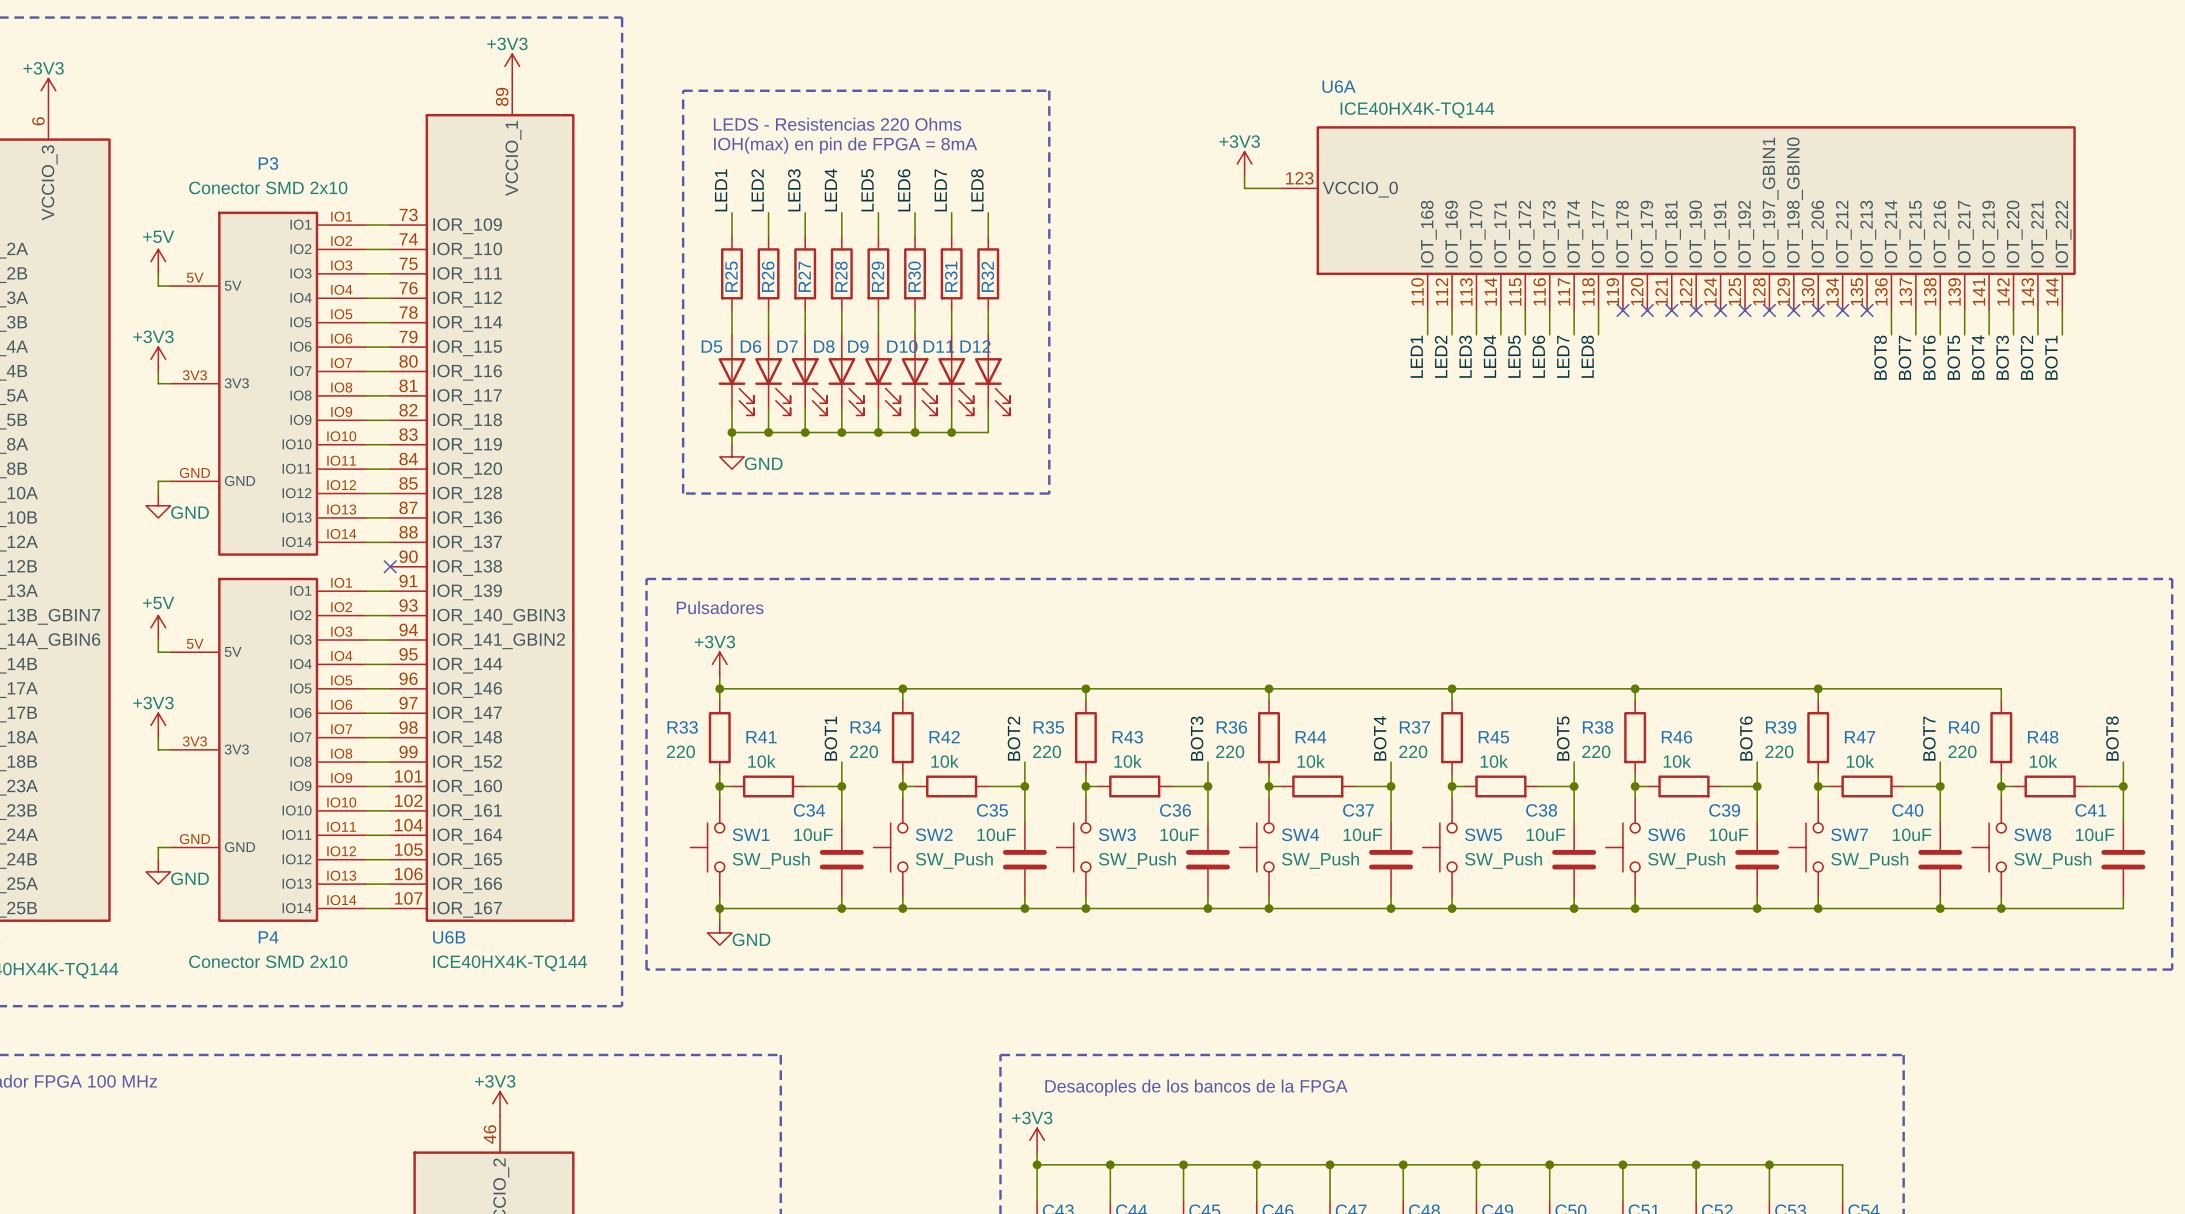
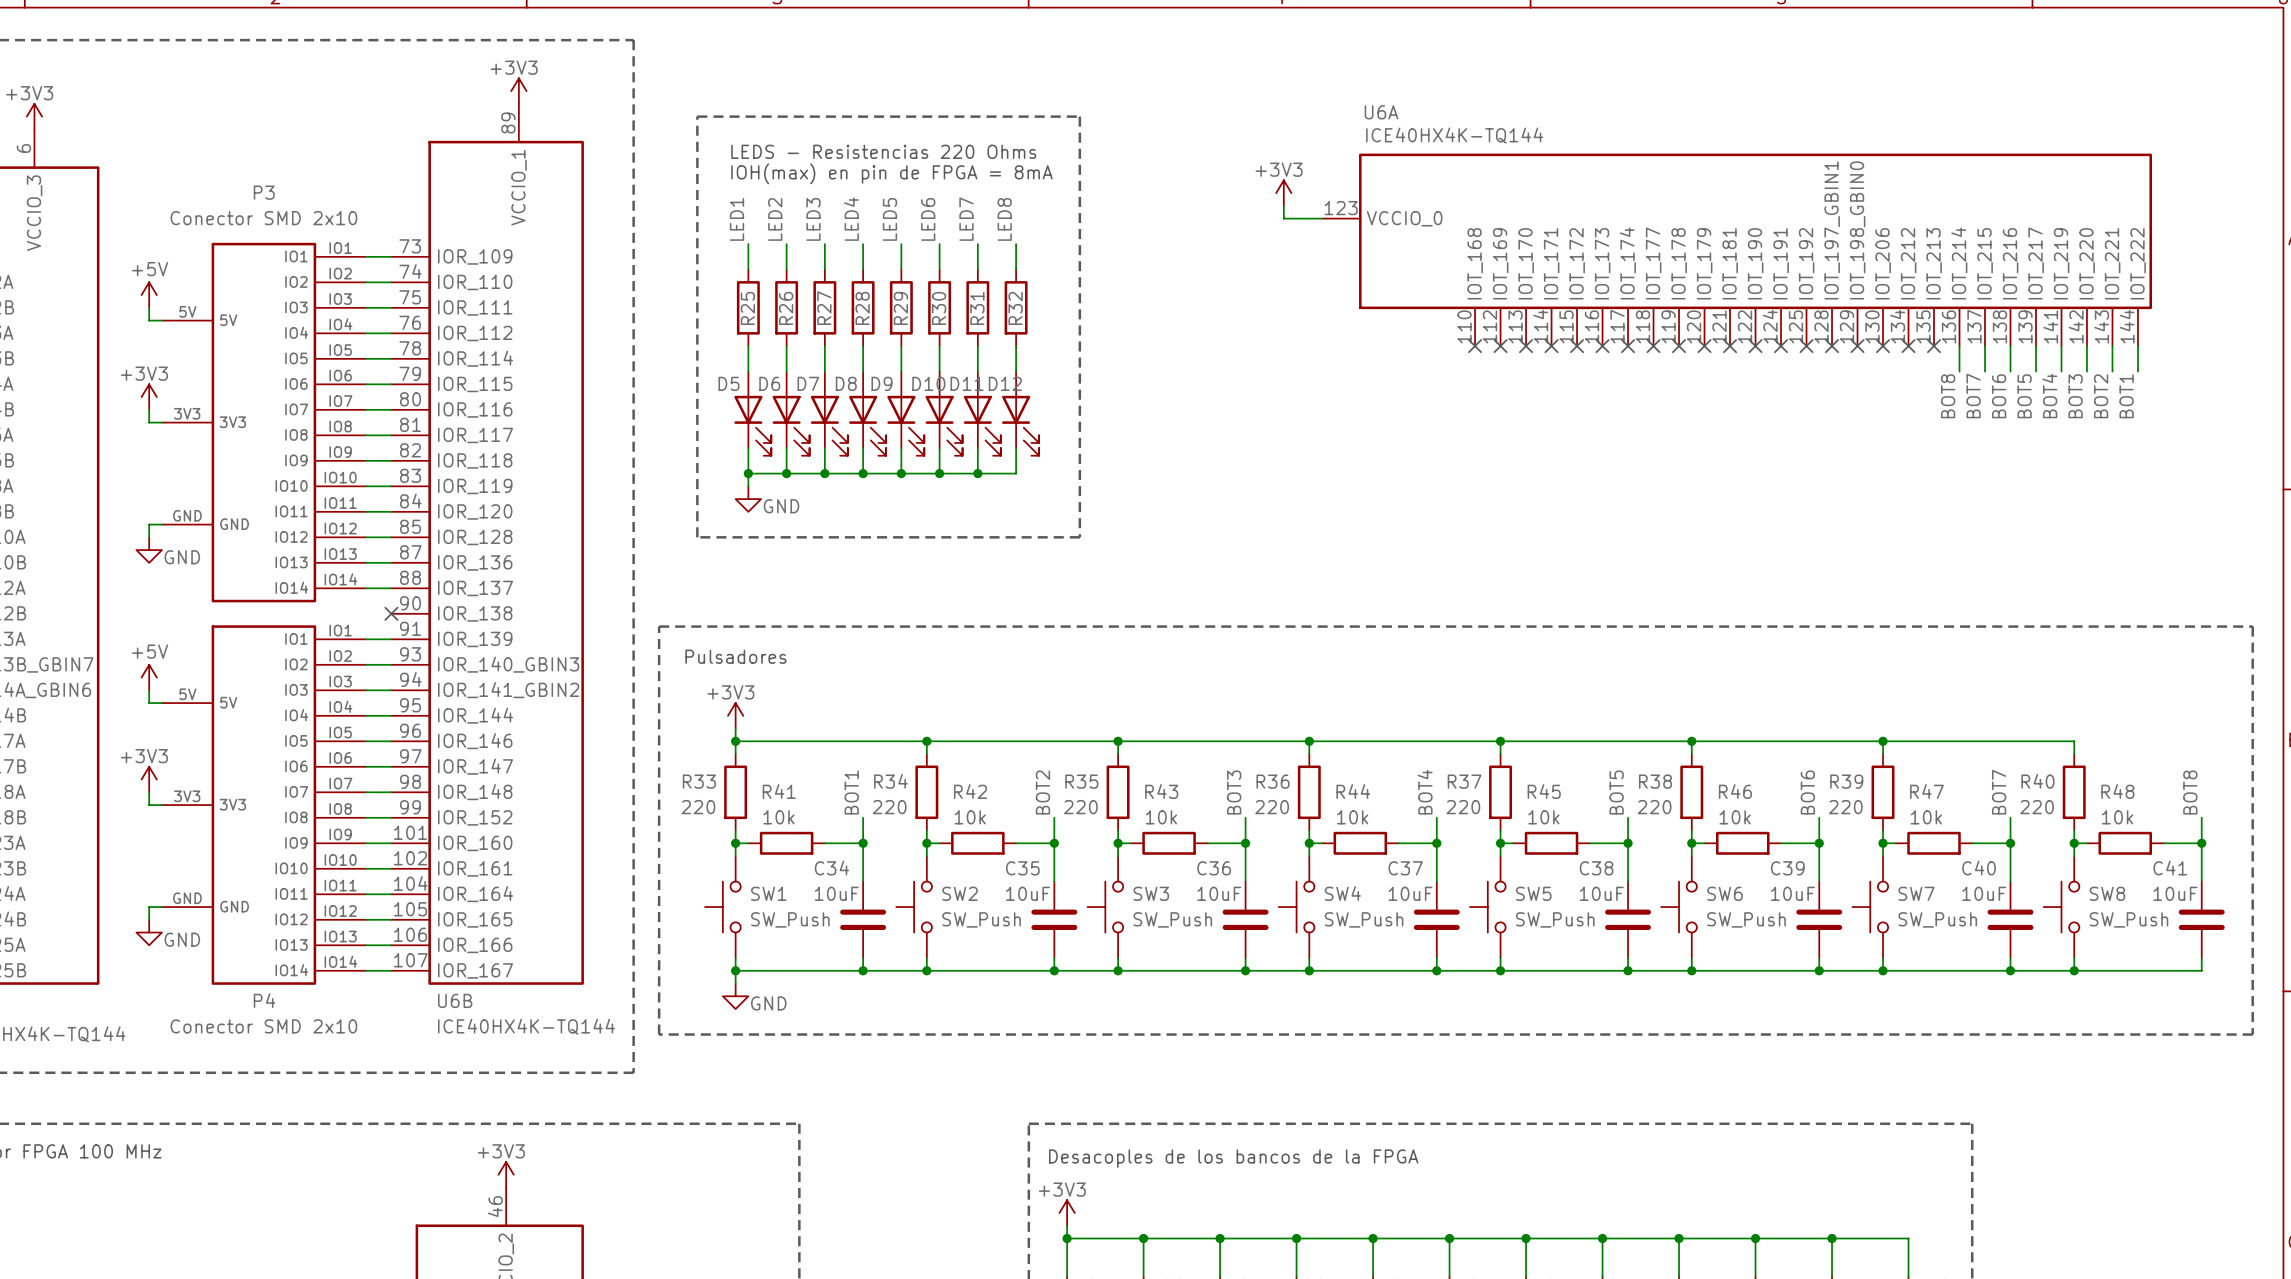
wire: (1427, 310) (1427, 334) -> none
no-connect mark: none -> (1475, 346)
wire: (1452, 310) (1452, 334) -> none
no-connect mark: none -> (1500, 346)
wire: (1476, 310) (1476, 334) -> none
no-connect mark: none -> (1526, 346)
wire: (1500, 310) (1500, 334) -> none
no-connect mark: none -> (1551, 346)
wire: (1525, 310) (1525, 334) -> none
no-connect mark: none -> (1577, 346)
wire: (1549, 310) (1549, 334) -> none
no-connect mark: none -> (1602, 346)
wire: (1574, 310) (1574, 334) -> none
no-connect mark: none -> (1628, 346)
wire: (1598, 310) (1598, 334) -> none
no-connect mark: none -> (1653, 346)
label: LED1 (1416, 356) -> none
label: LED2 (1441, 356) -> none
label: LED3 (1465, 356) -> none
label: LED4 (1490, 356) -> none
label: LED5 (1514, 356) -> none
label: LED6 (1538, 356) -> none
label: LED7 (1563, 356) -> none
label: LED8 (1587, 356) -> none

